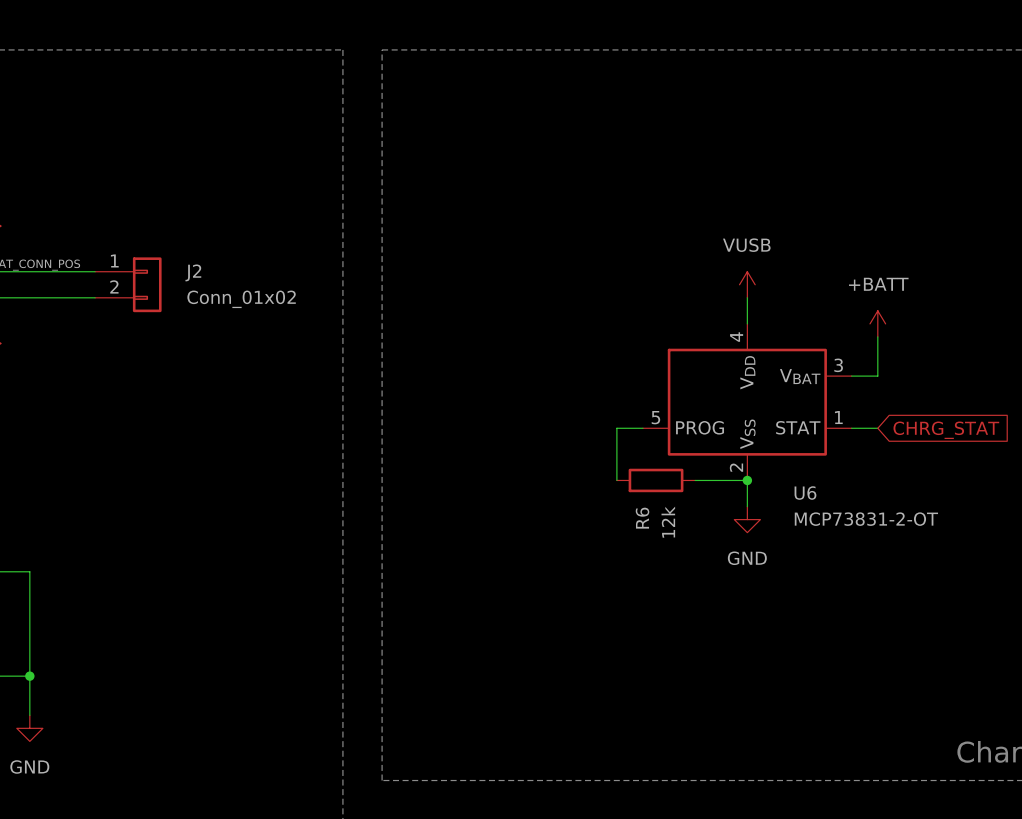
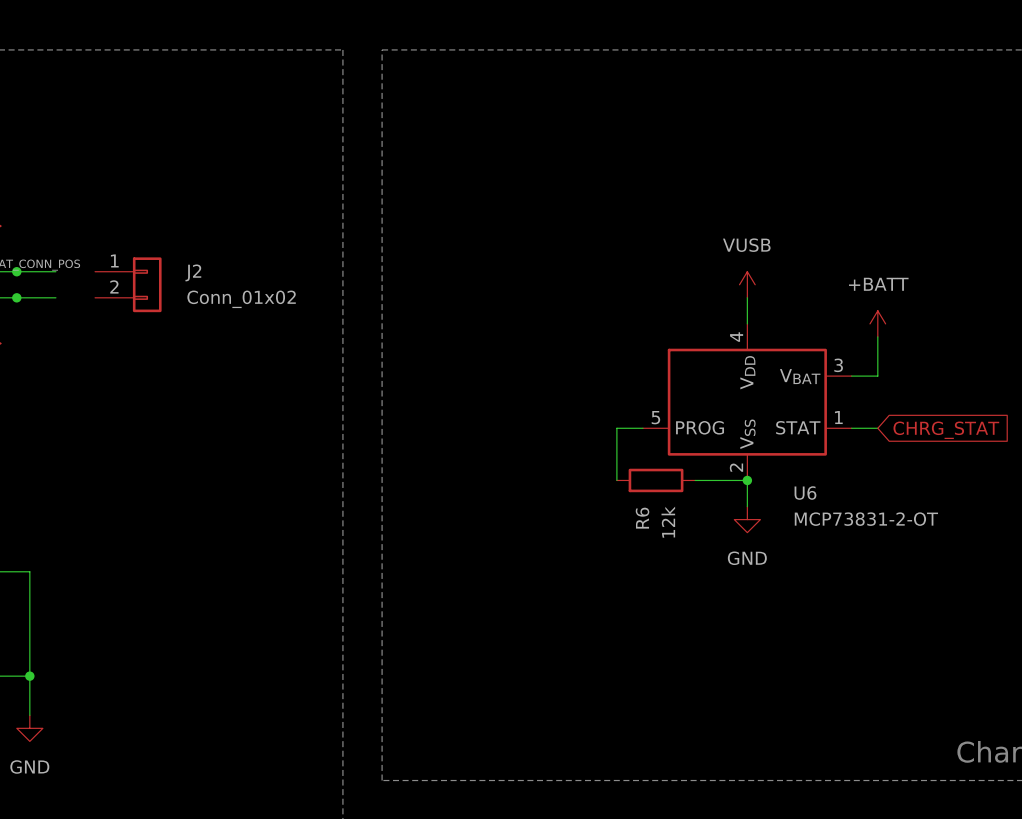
junction: none -> (16, 271)
wire: (55, 271) (95, 271) -> none
junction: none -> (16, 297)
wire: (55, 297) (95, 297) -> none

